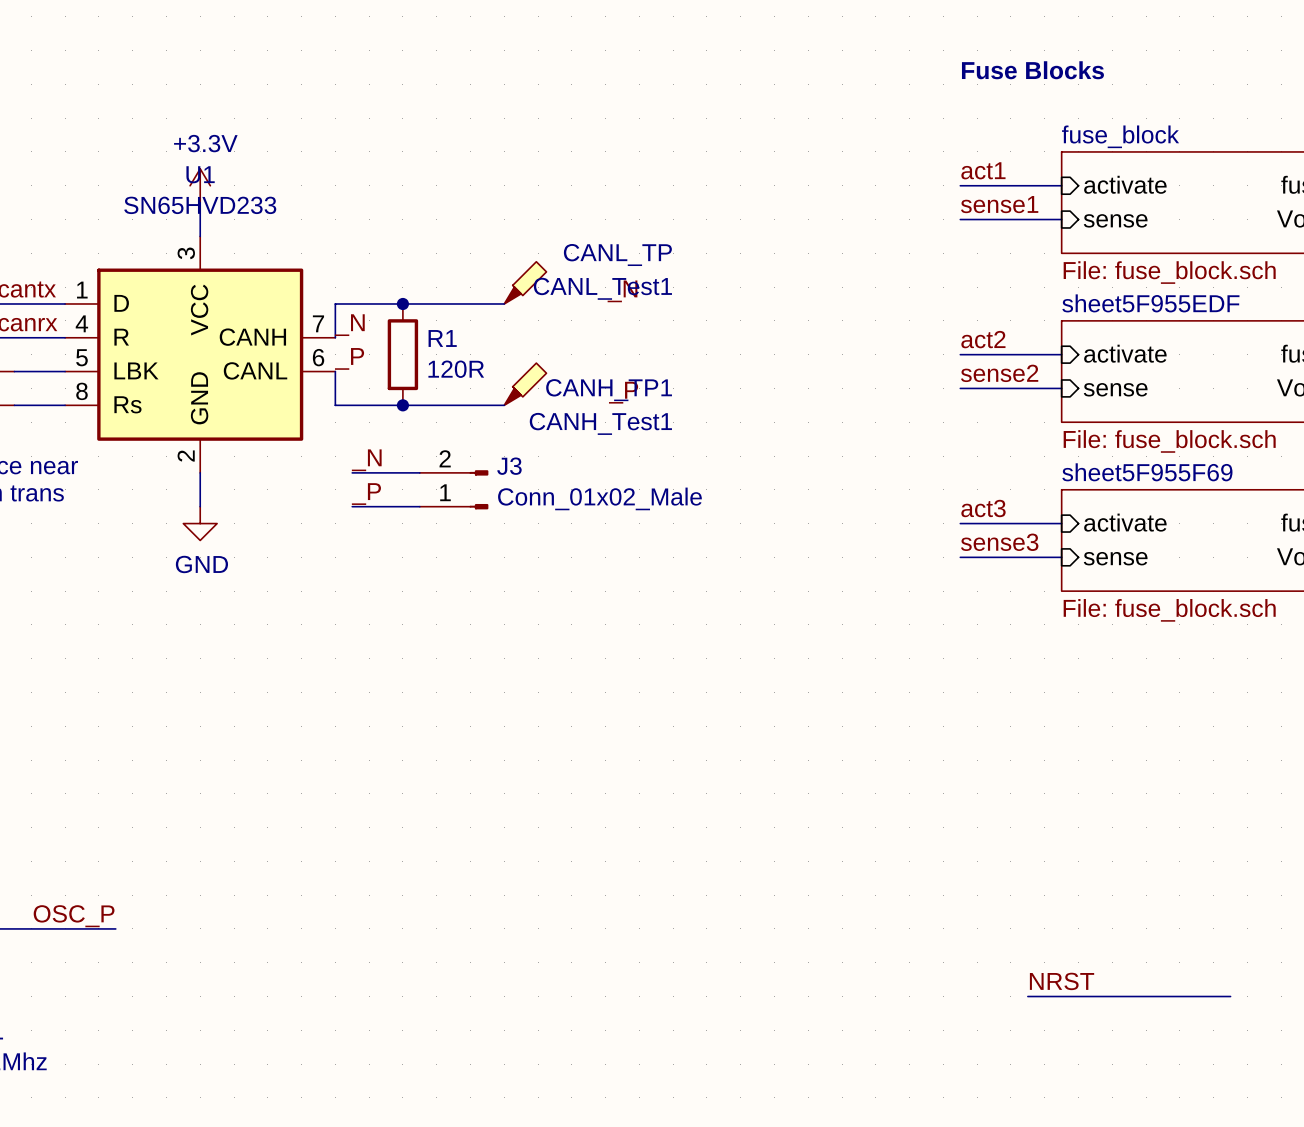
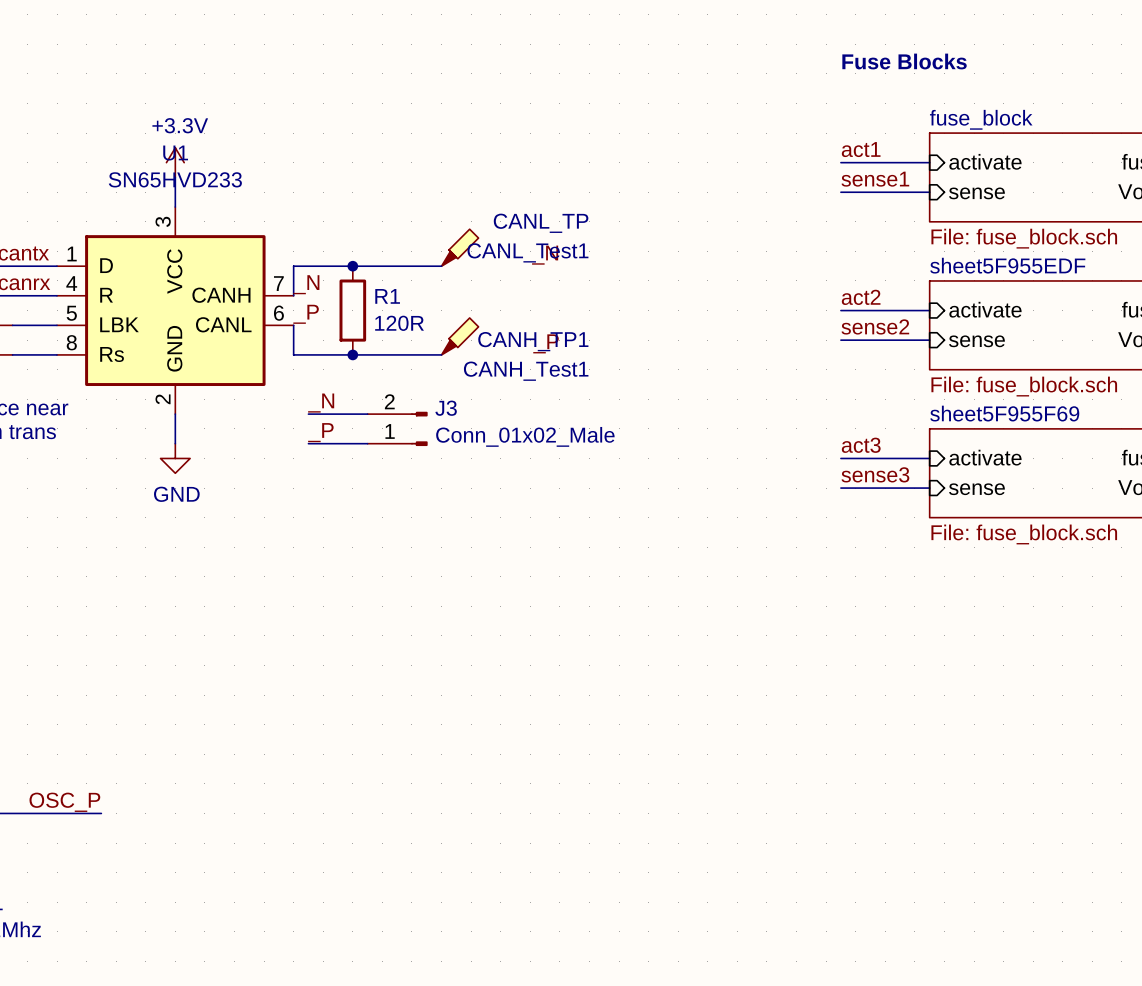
label: NRST (1062, 981) -> none
wire: (1027, 996) (1230, 996) -> none

